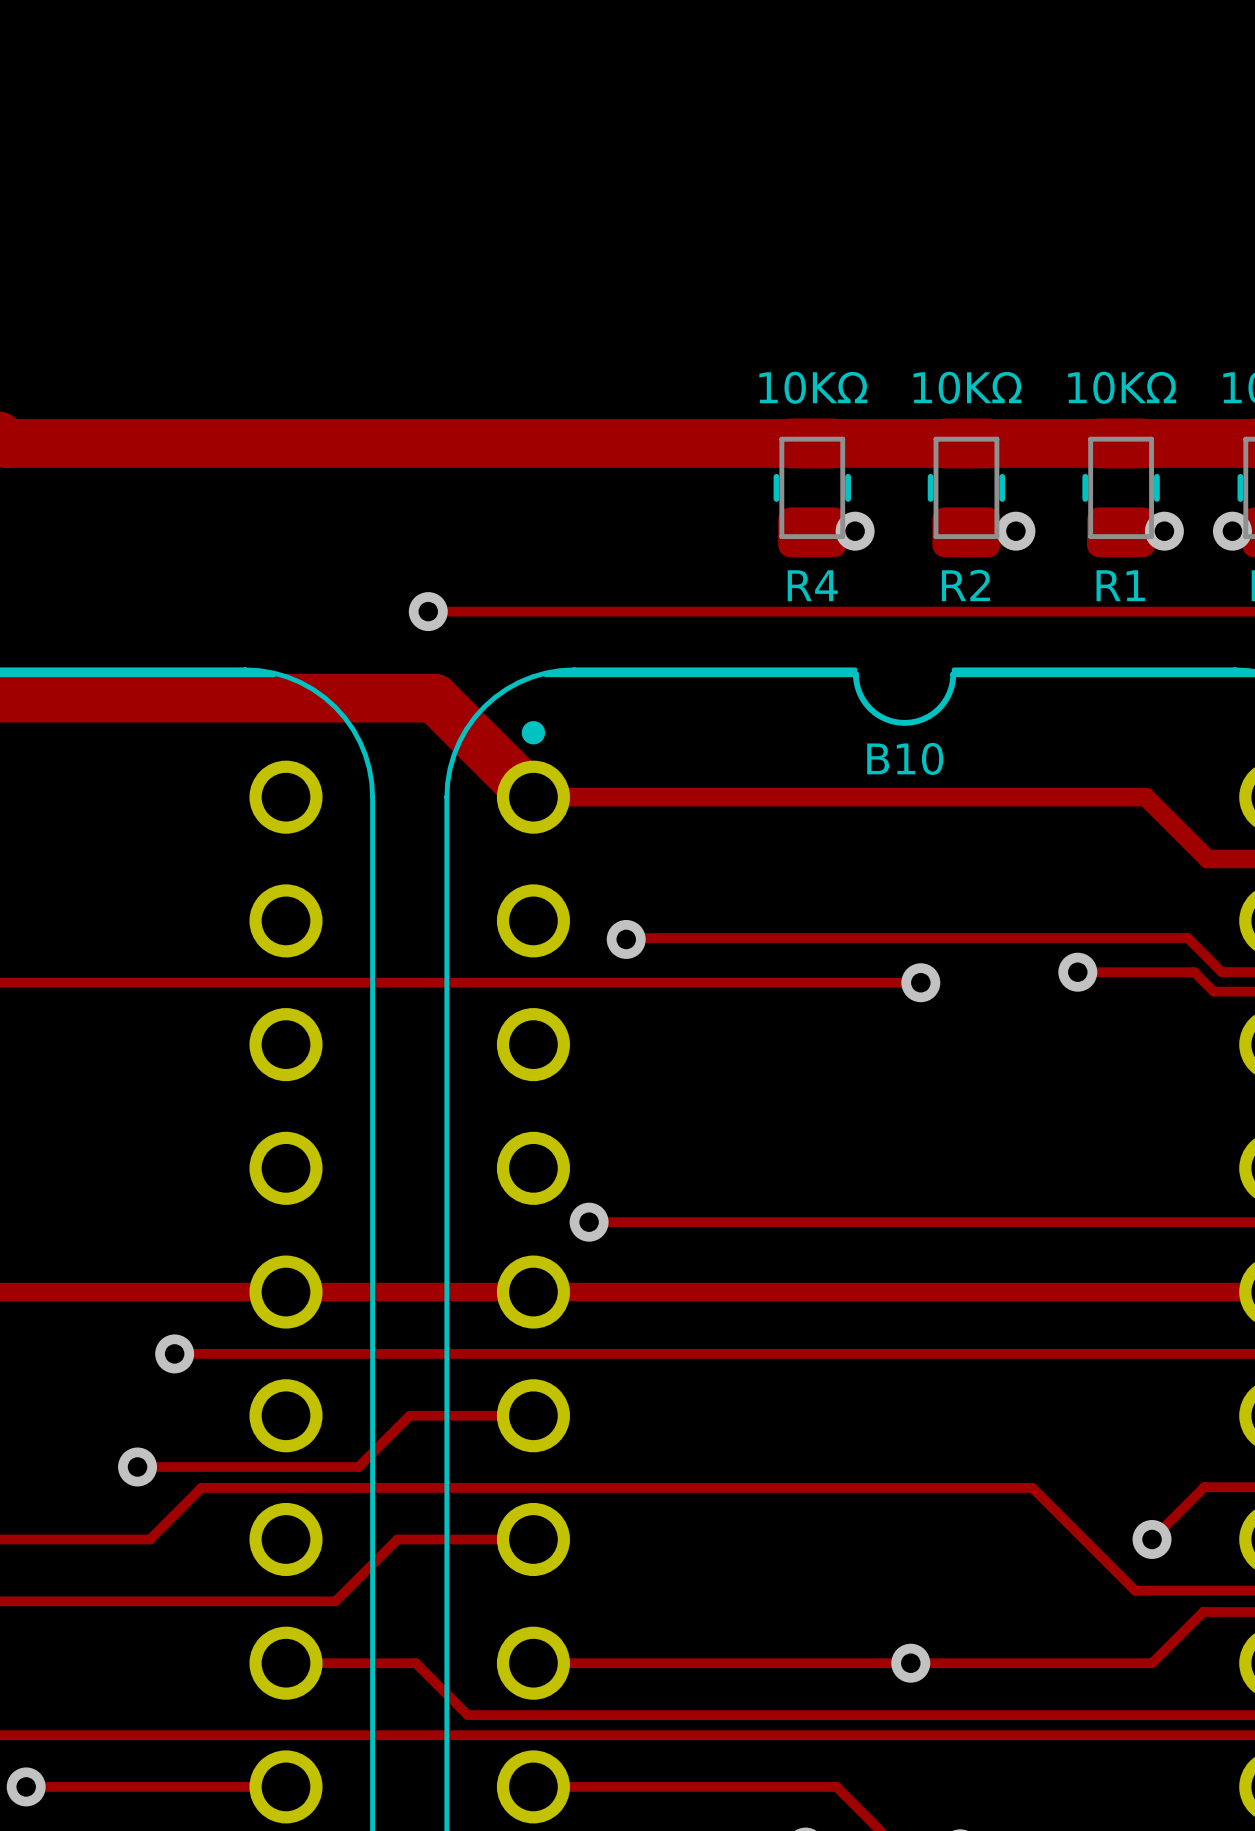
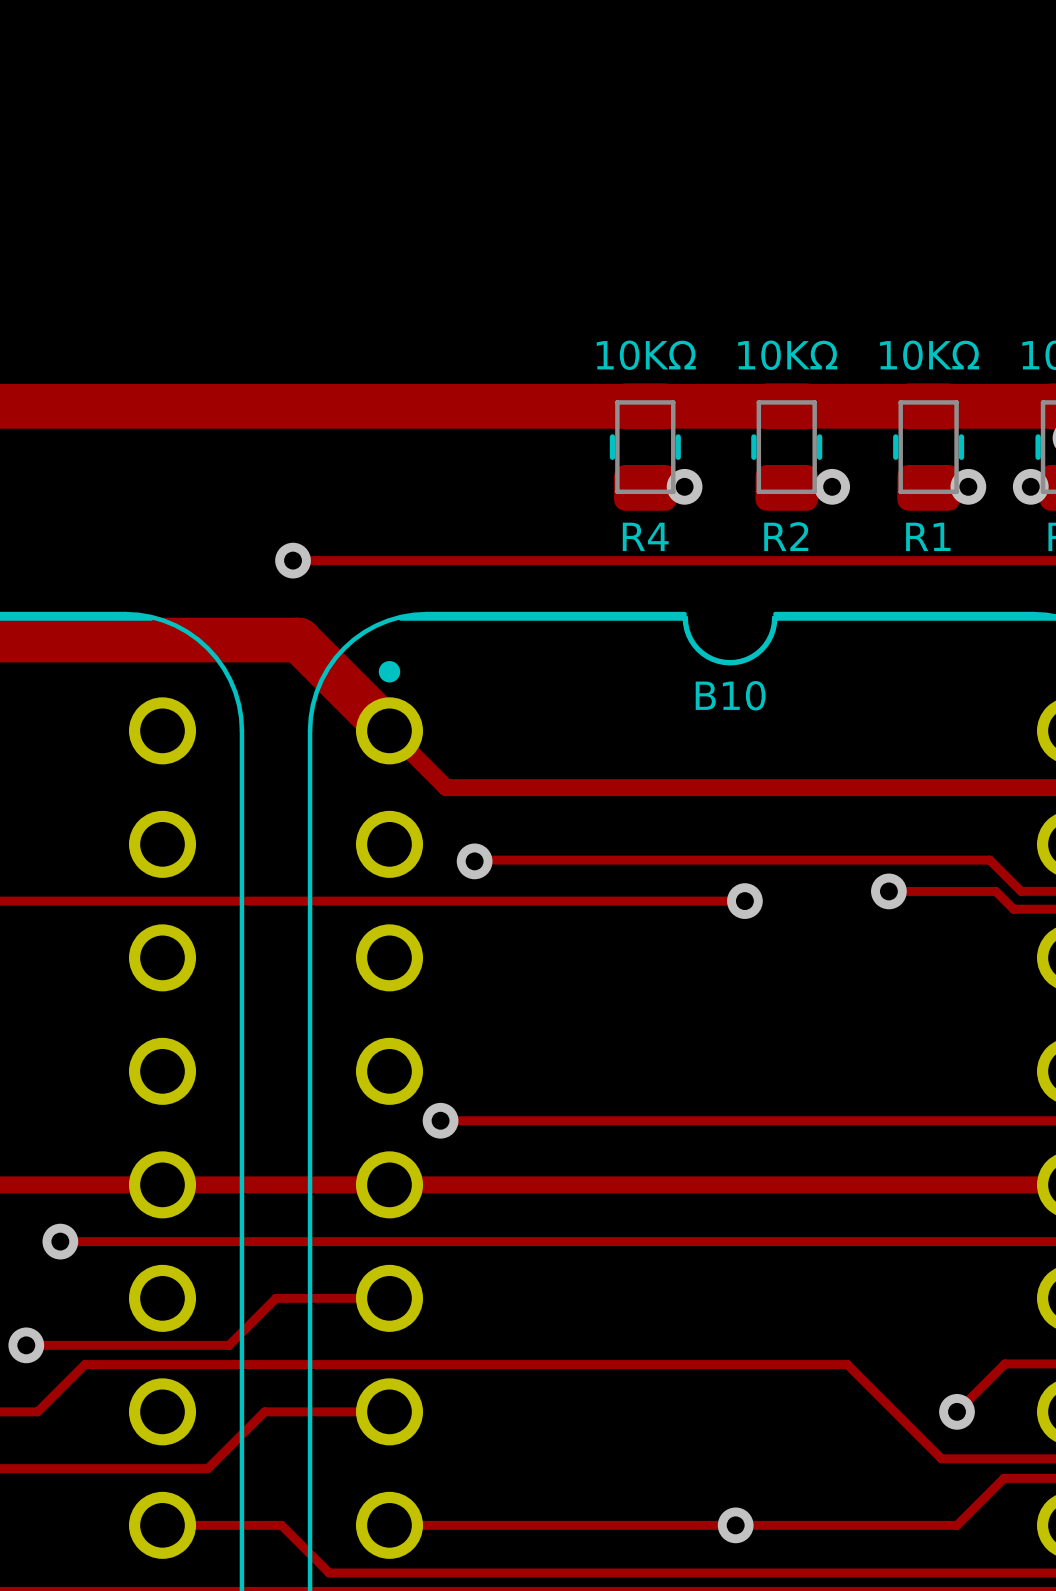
track: (533, 797) (1145, 797) (1207, 859) -> (389, 730) (446, 787) (1008, 787)

